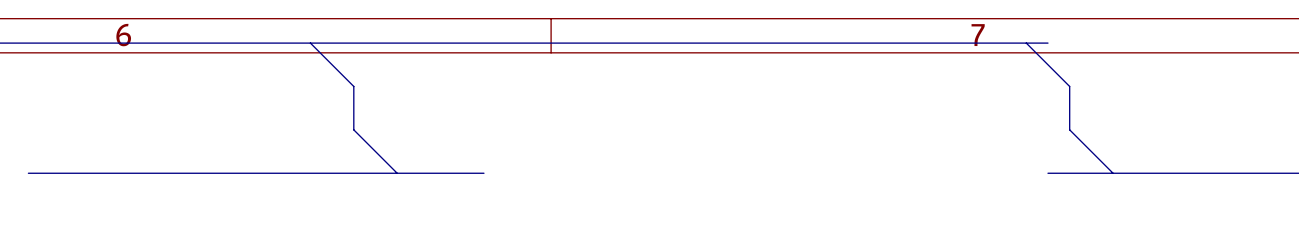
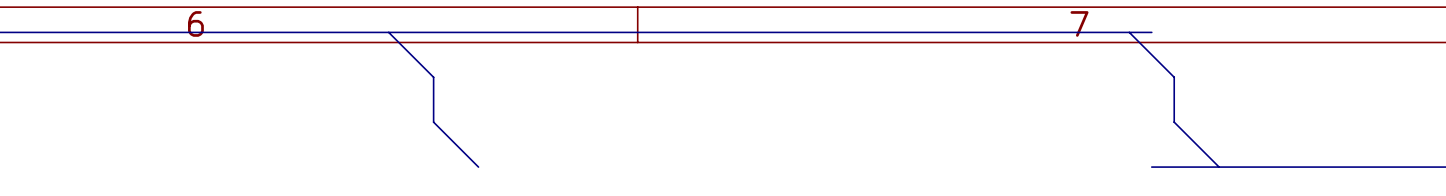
bus: (28, 173) (483, 173) -> none

